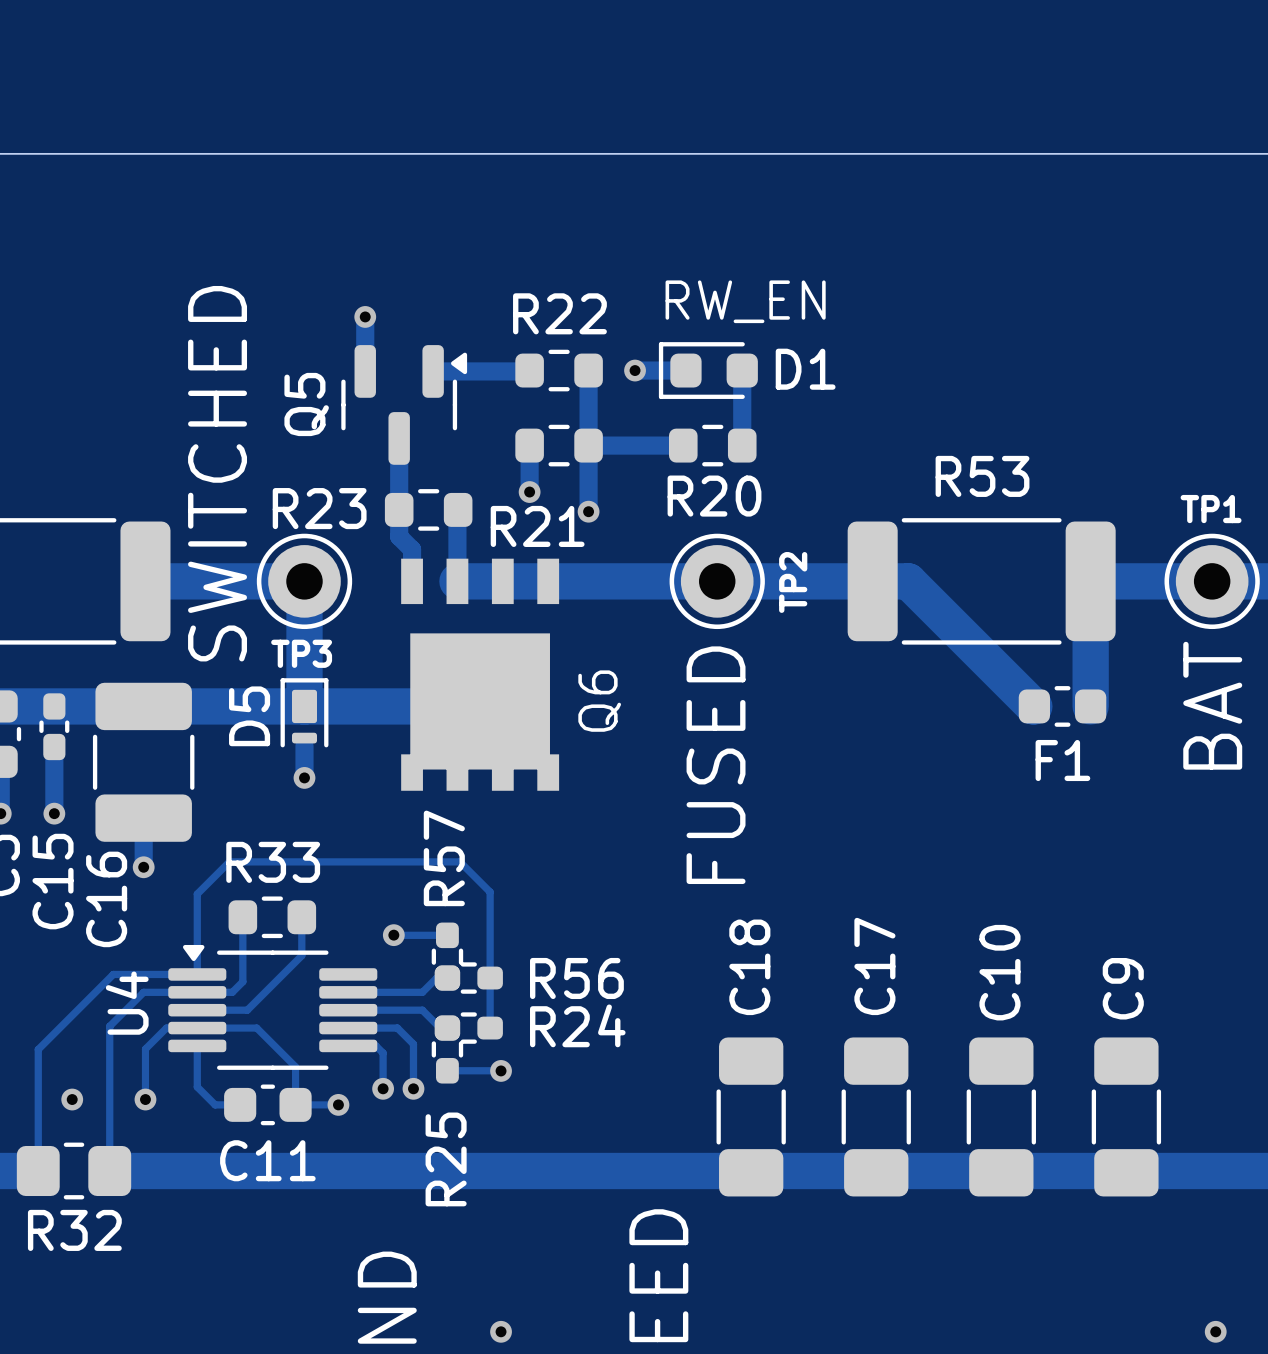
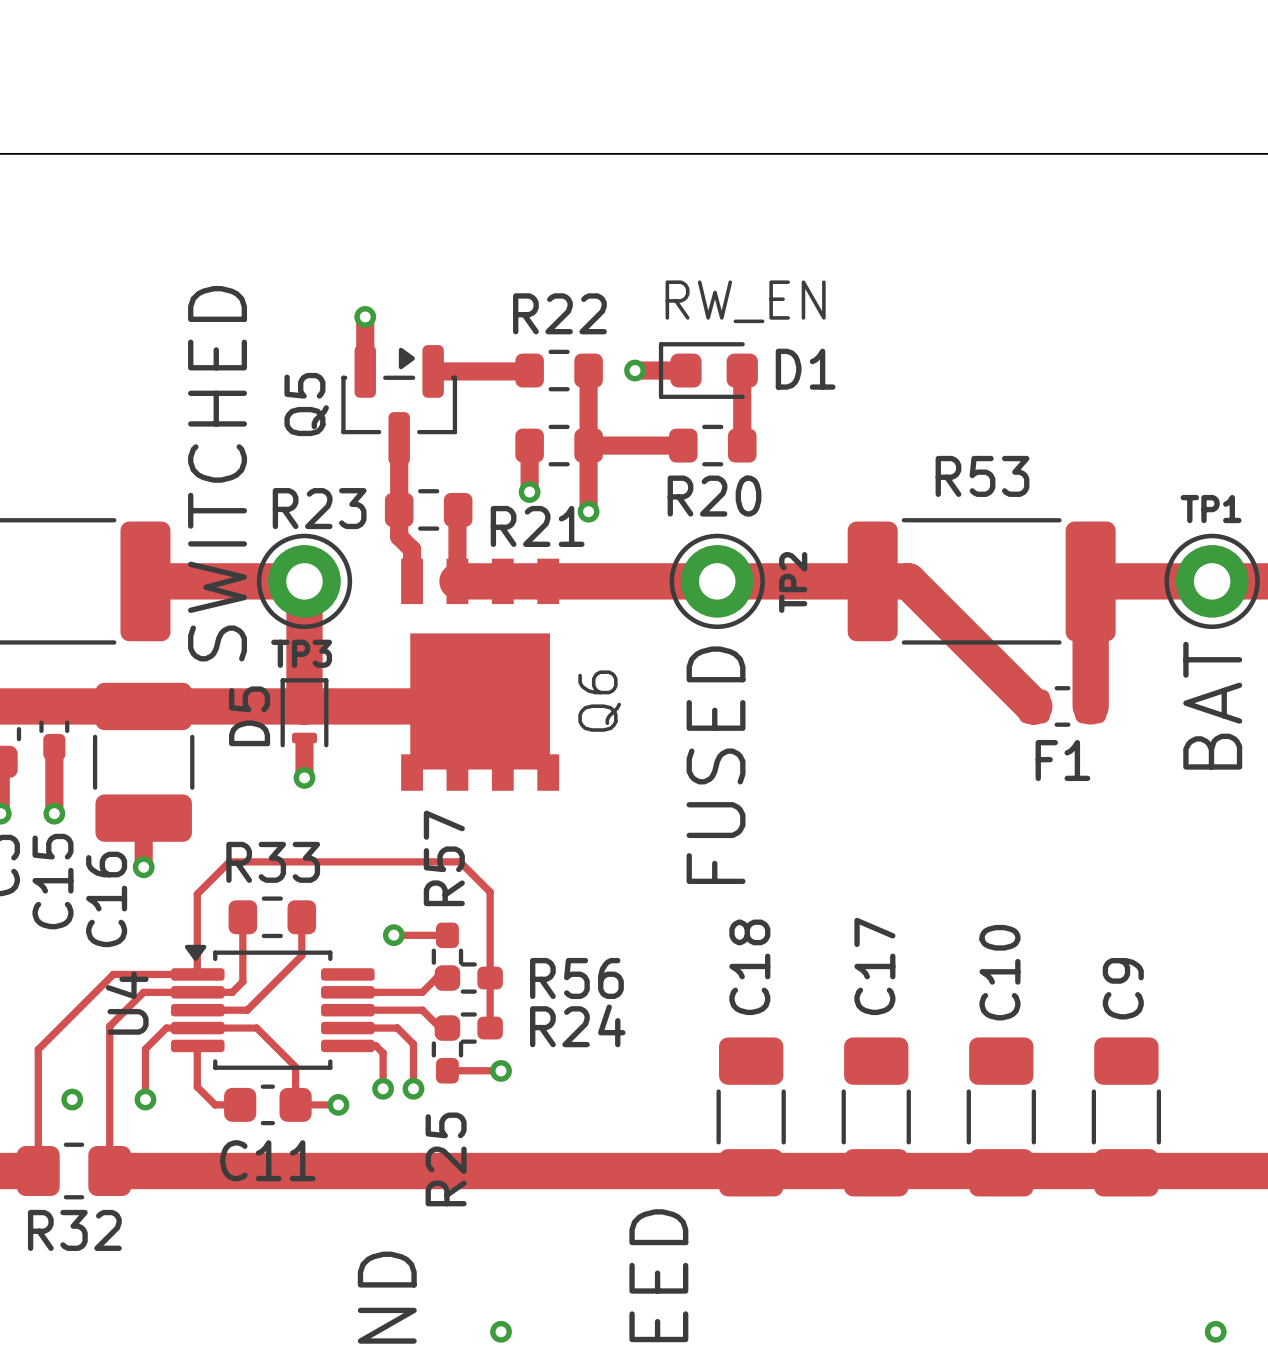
Q5 footprint: [341, 345, 468, 465] -> [341, 345, 458, 465]
U4 footprint: [168, 944, 378, 1070] -> [170, 944, 375, 1070]

